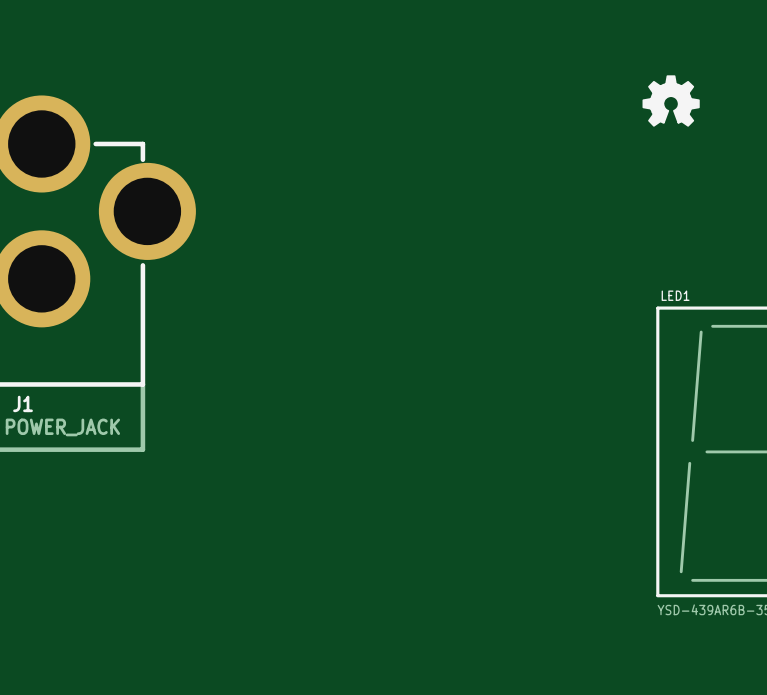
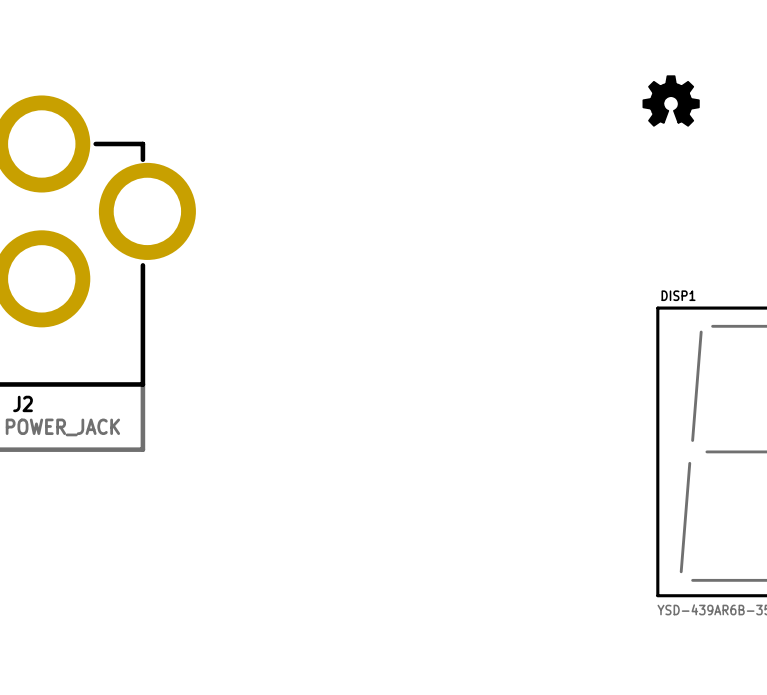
LED1 name: LED1 (675, 295) -> DISP1 (678, 295)
J1 name: J1 (23, 403) -> J2 (23, 403)

